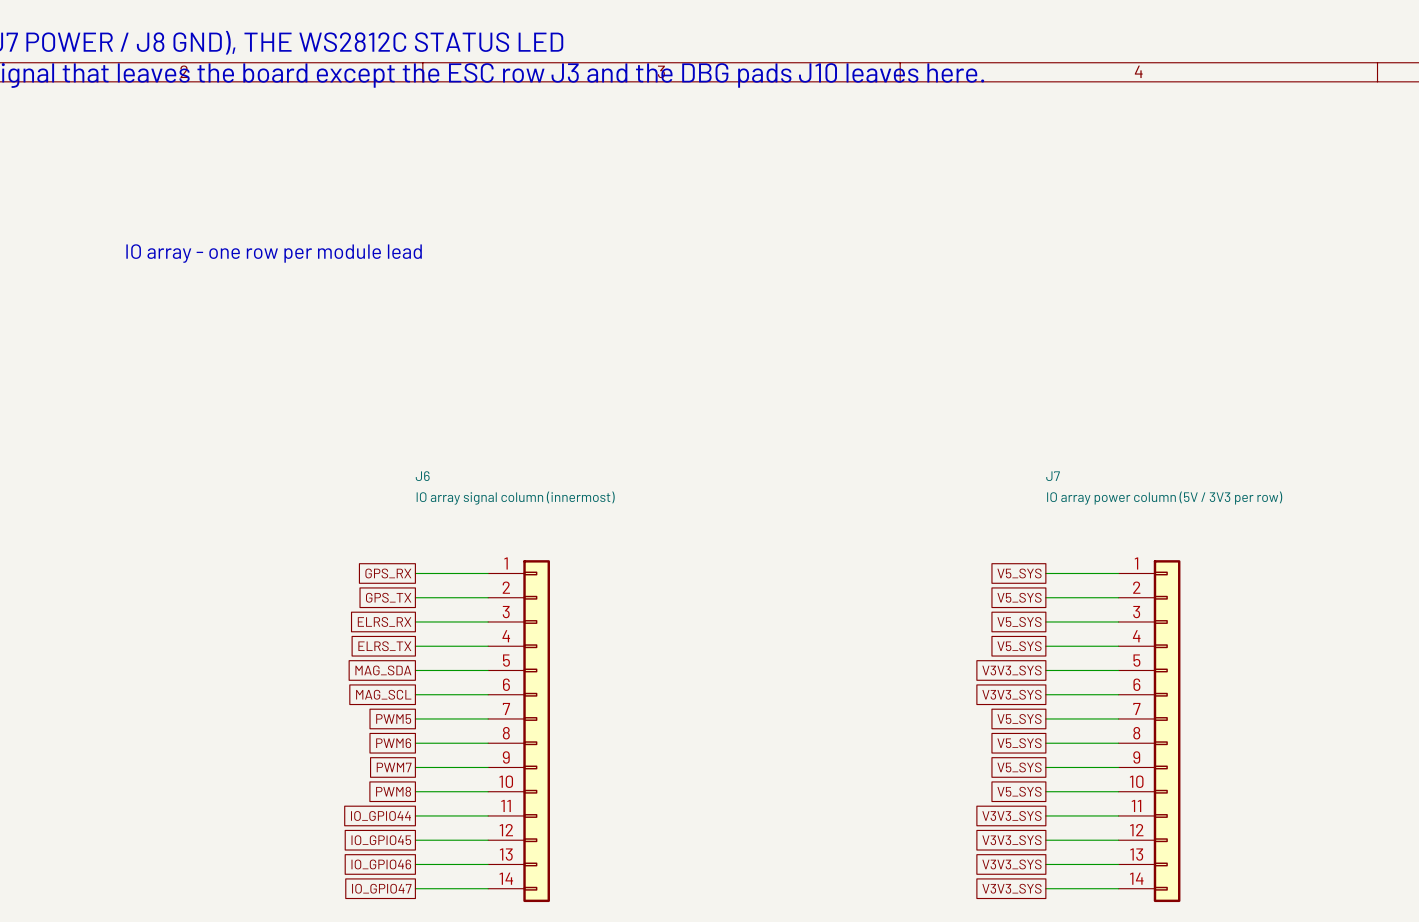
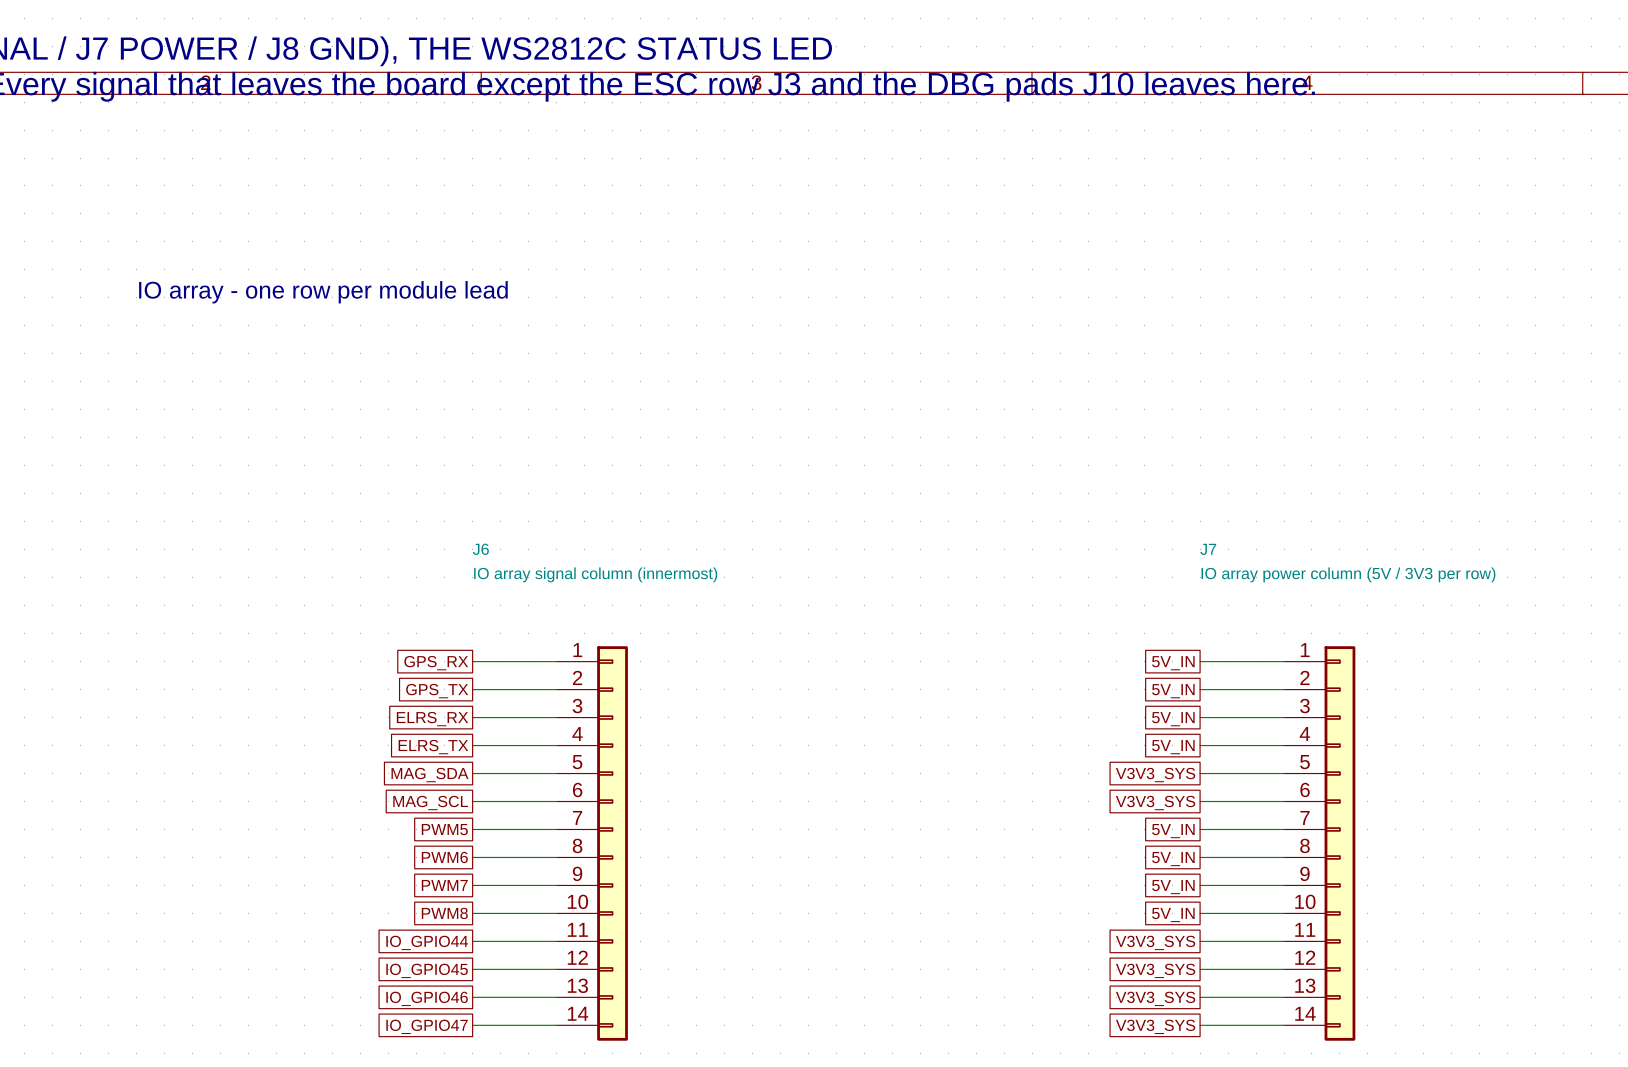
global label: V5_SYS (1019, 573) -> 5V_IN (1173, 663)
global label: V5_SYS (1019, 597) -> 5V_IN (1173, 691)
global label: V5_SYS (1019, 621) -> 5V_IN (1173, 719)
global label: V5_SYS (1019, 646) -> 5V_IN (1173, 747)
global label: V5_SYS (1019, 718) -> 5V_IN (1173, 831)
global label: V5_SYS (1019, 743) -> 5V_IN (1173, 859)
global label: V5_SYS (1019, 767) -> 5V_IN (1173, 887)
global label: V5_SYS (1019, 791) -> 5V_IN (1173, 915)

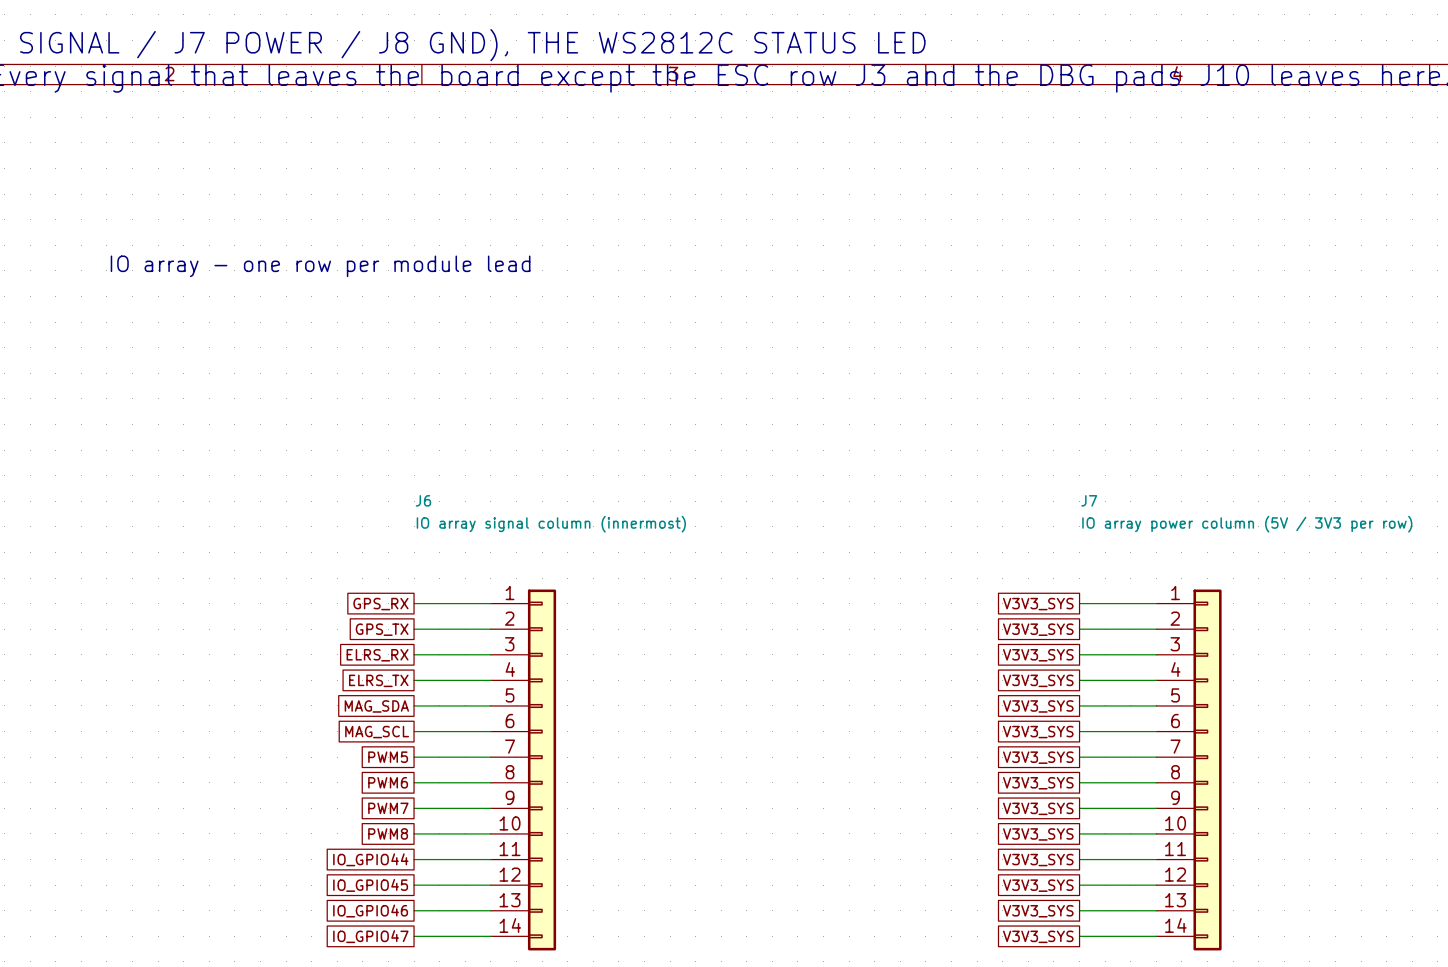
global label: 5V_IN (1173, 663) -> V3V3_SYS (1038, 604)
global label: 5V_IN (1173, 691) -> V3V3_SYS (1038, 629)
global label: 5V_IN (1173, 719) -> V3V3_SYS (1038, 655)
global label: 5V_IN (1173, 747) -> V3V3_SYS (1038, 680)
global label: 5V_IN (1173, 831) -> V3V3_SYS (1038, 757)
global label: 5V_IN (1173, 859) -> V3V3_SYS (1038, 783)
global label: 5V_IN (1173, 887) -> V3V3_SYS (1038, 808)
global label: 5V_IN (1173, 915) -> V3V3_SYS (1038, 834)

